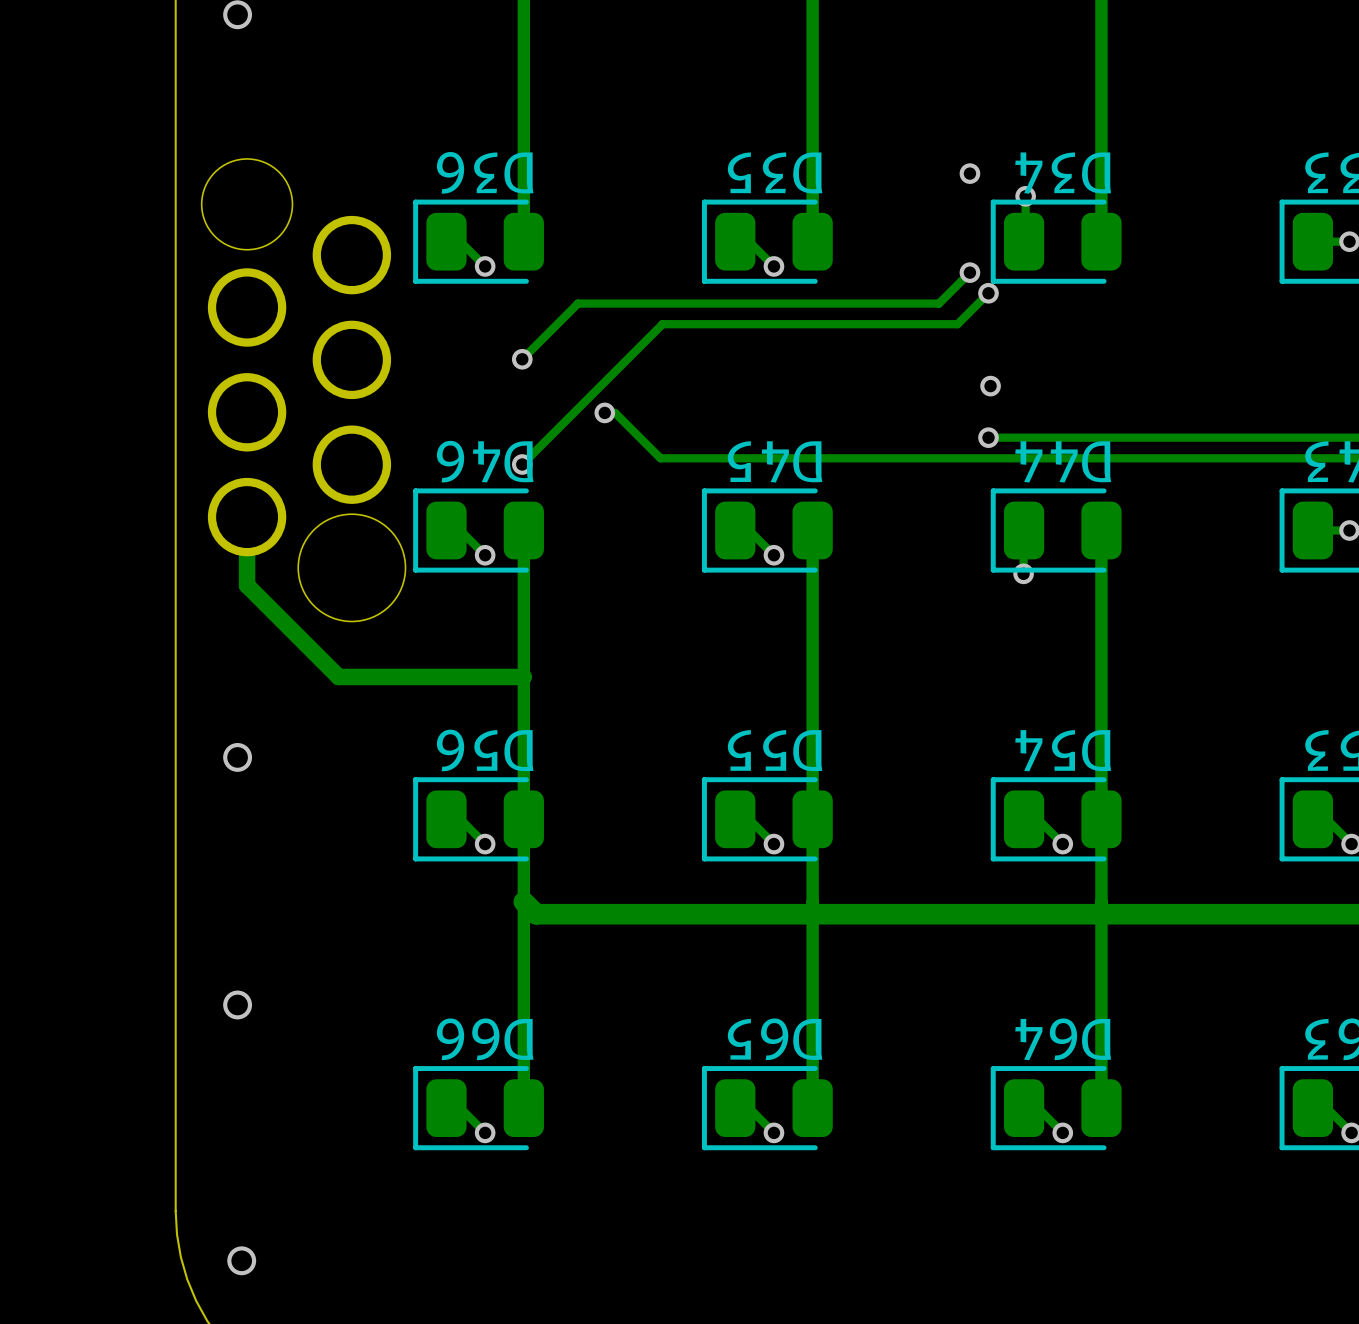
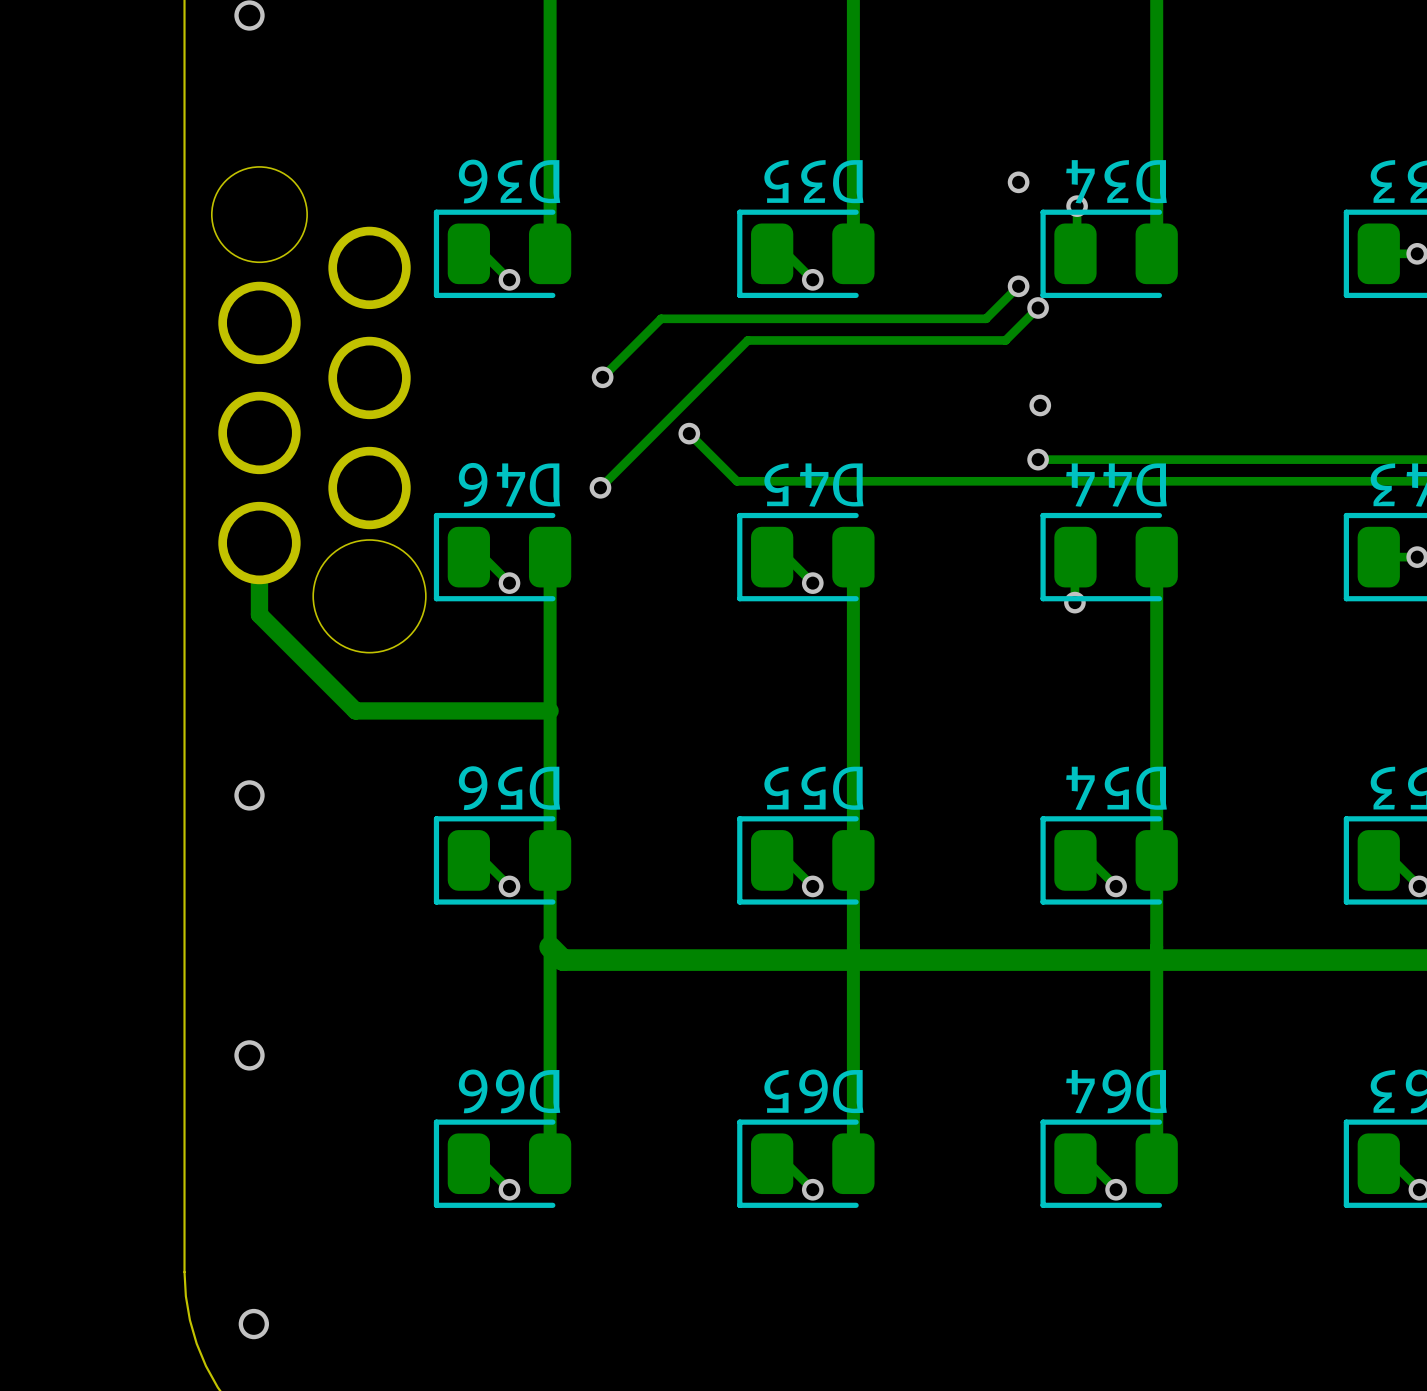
track: (629, 303) (577, 303) (522, 359) -> (661, 318) (602, 377)
track: (712, 324) (662, 324) (522, 464) -> (747, 340) (600, 487)
via: (522, 359) -> none
via: none -> (602, 377)
track: (604, 412) (615, 412) (660, 458) (701, 458) -> (689, 433) (736, 481)
via: (604, 412) -> none
via: none -> (689, 433)
via: (522, 464) -> none
via: none -> (600, 487)

